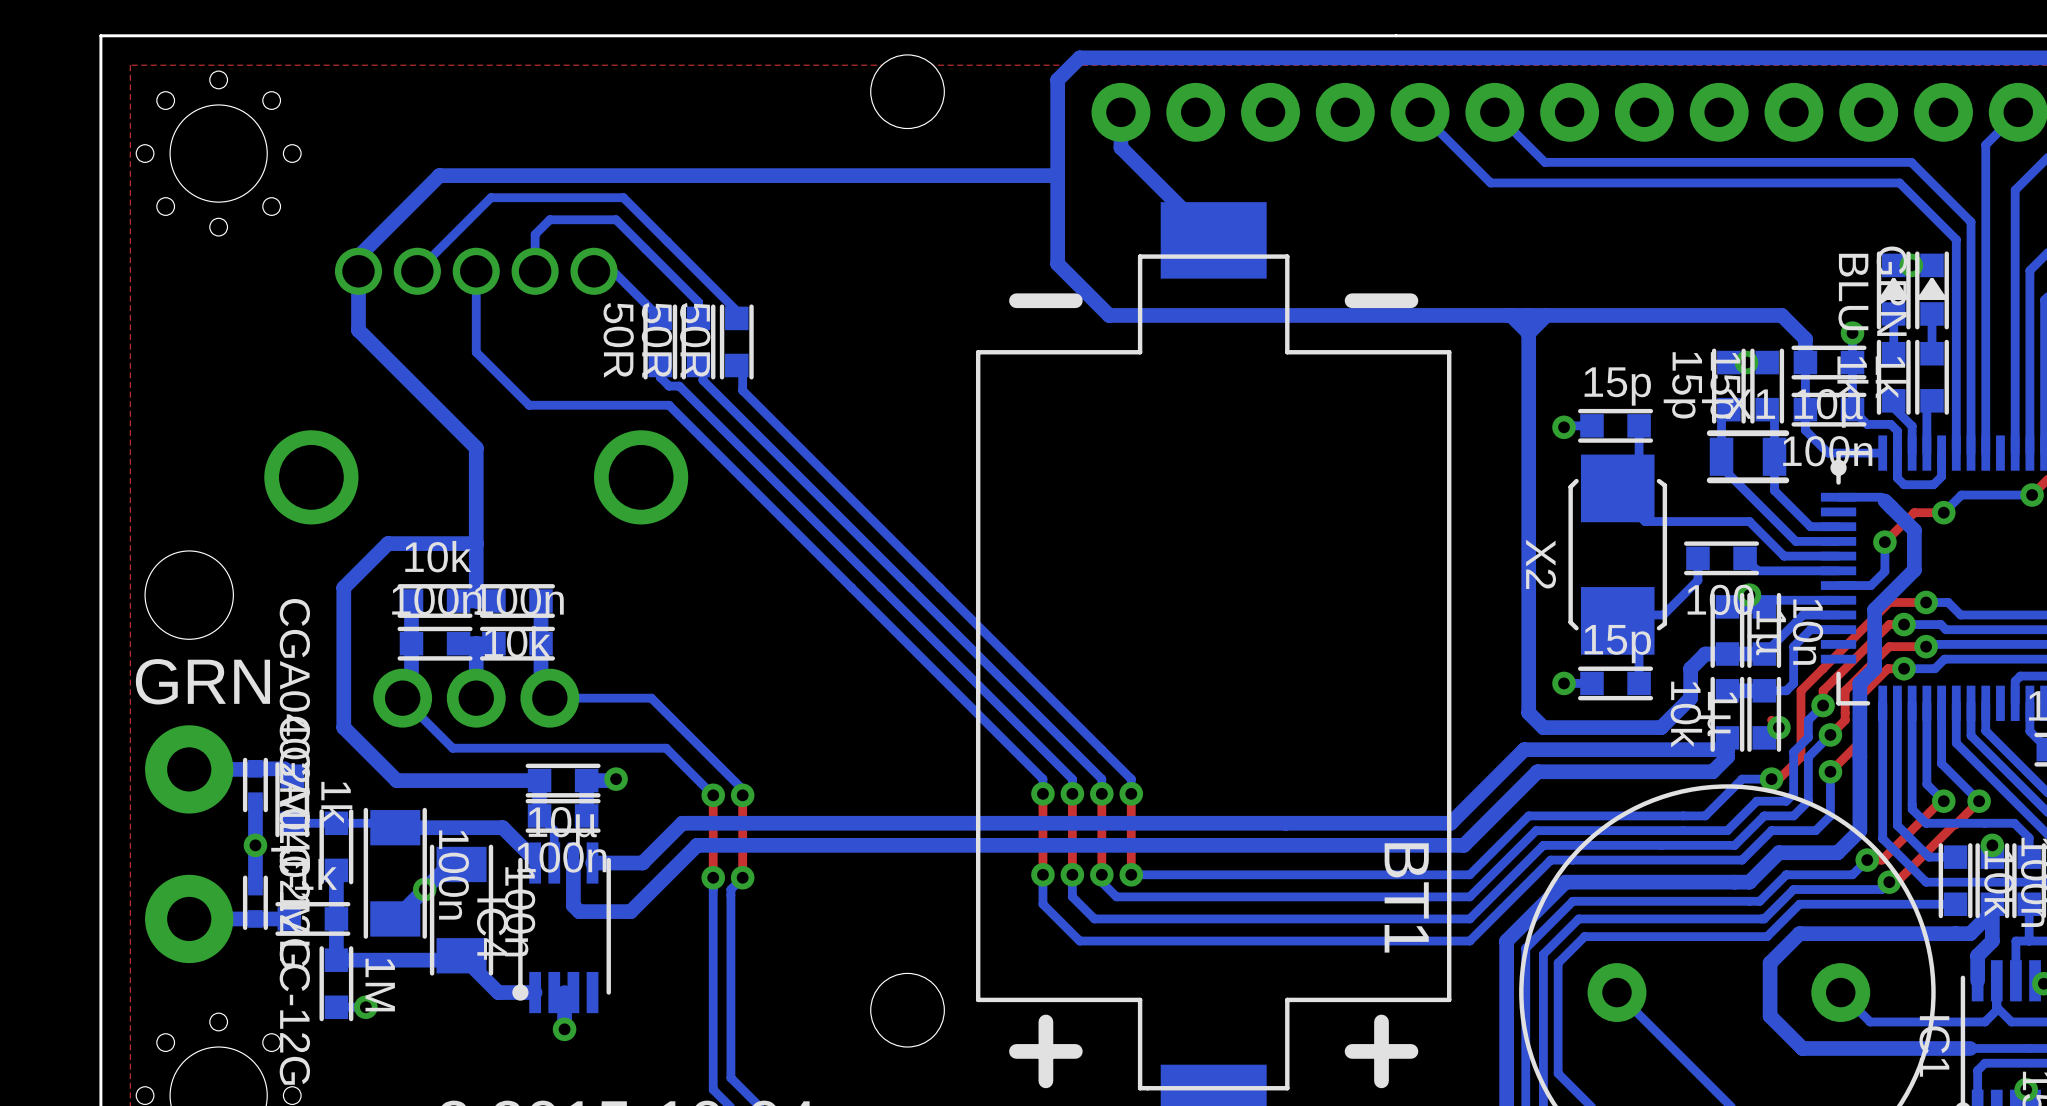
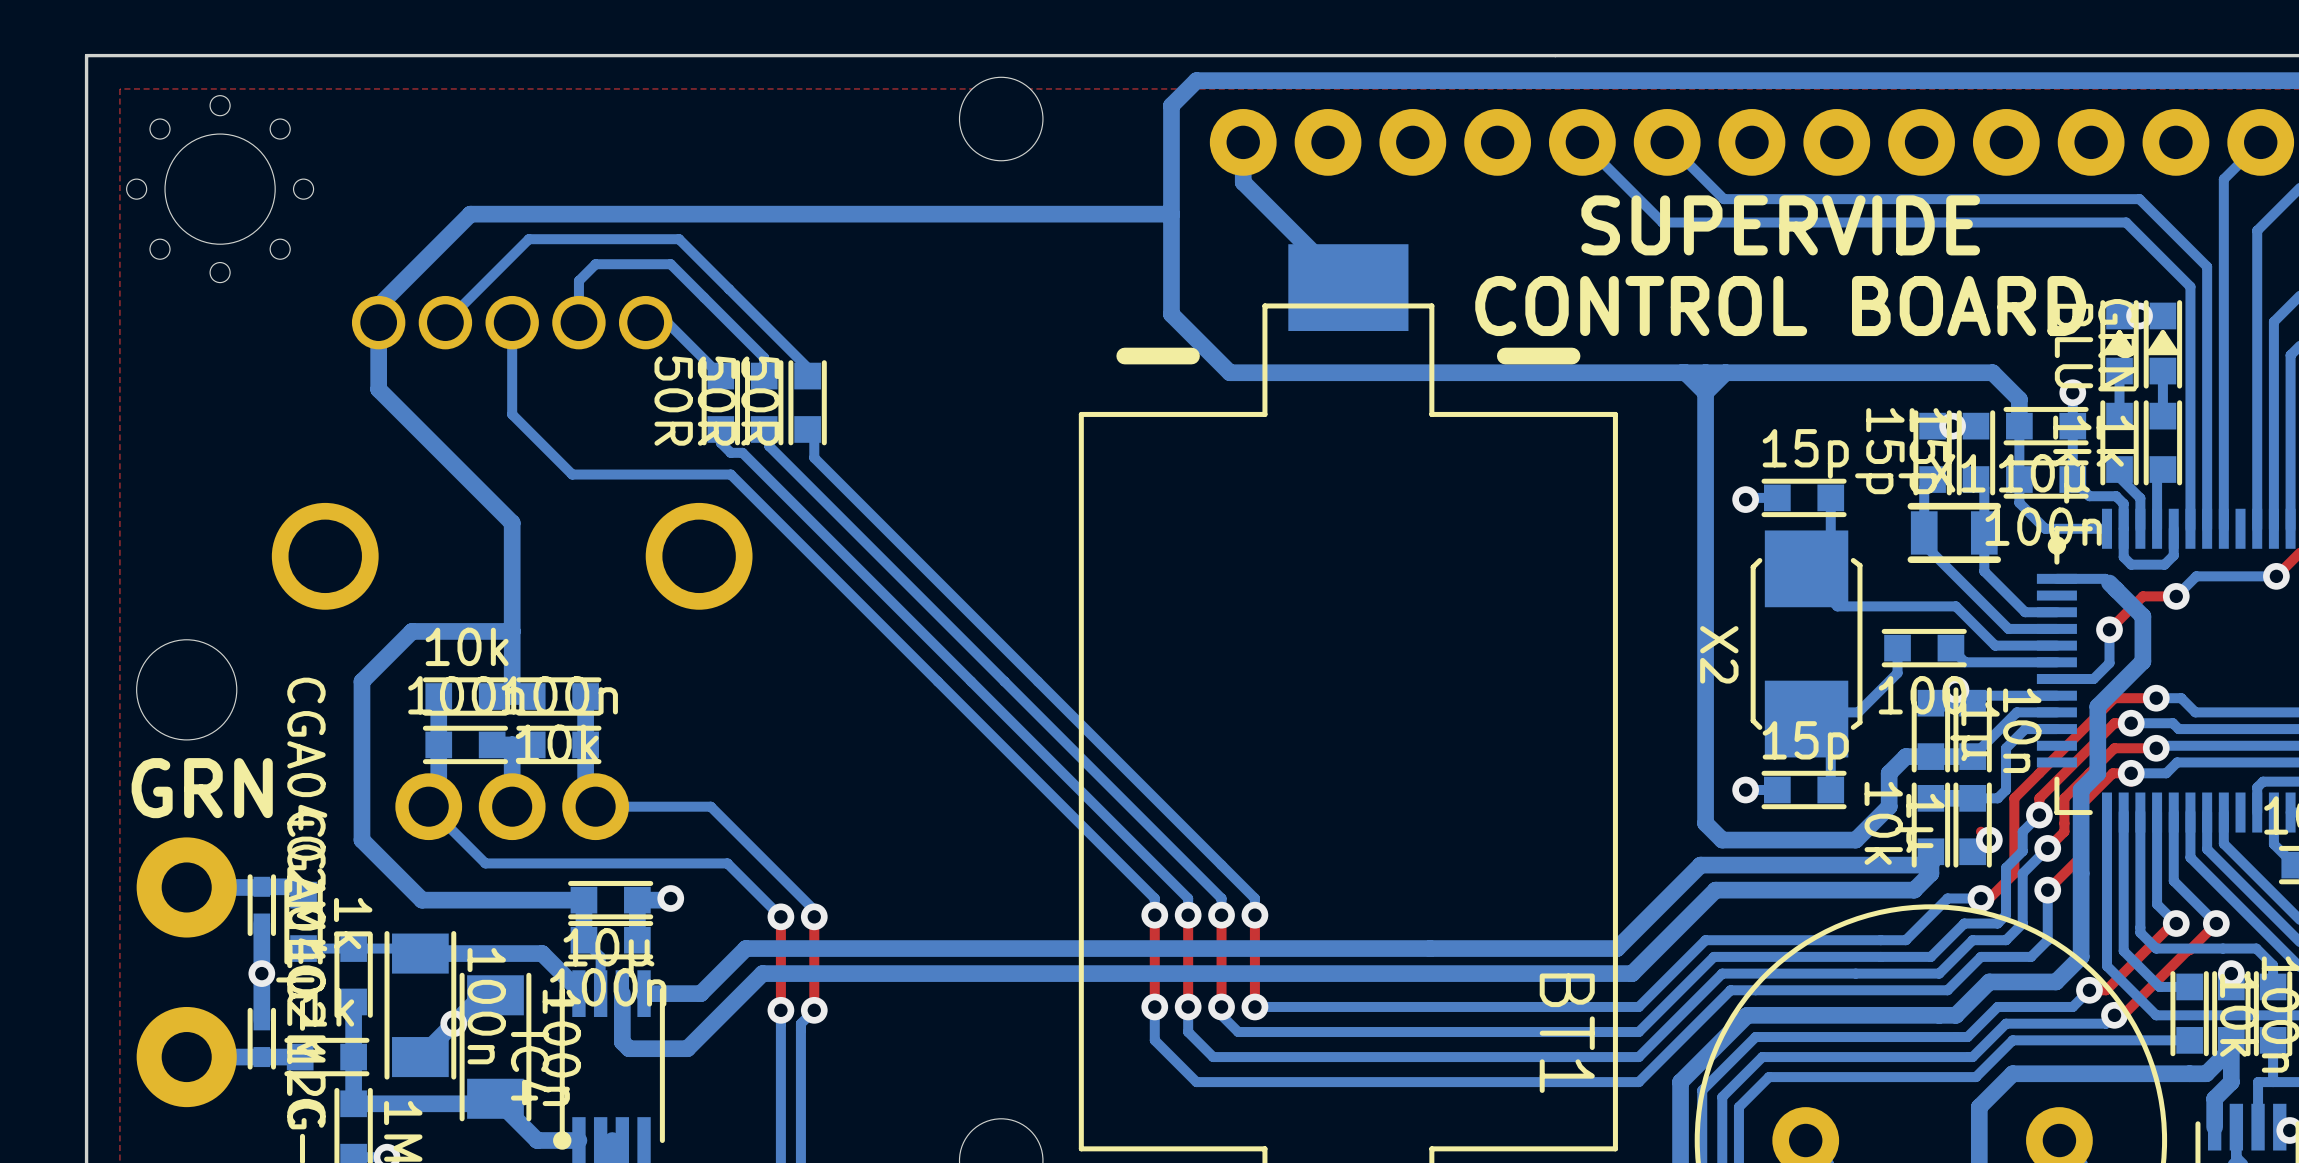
text: none -> SUPERVIDE (1780, 225)
text: none -> CONTROL BOARD (1780, 306)

